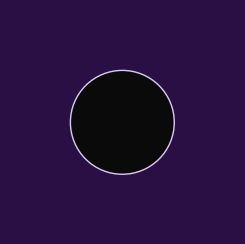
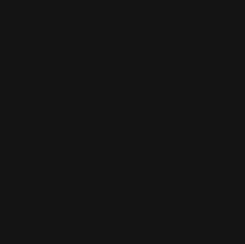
part: (122, 122) -> none

